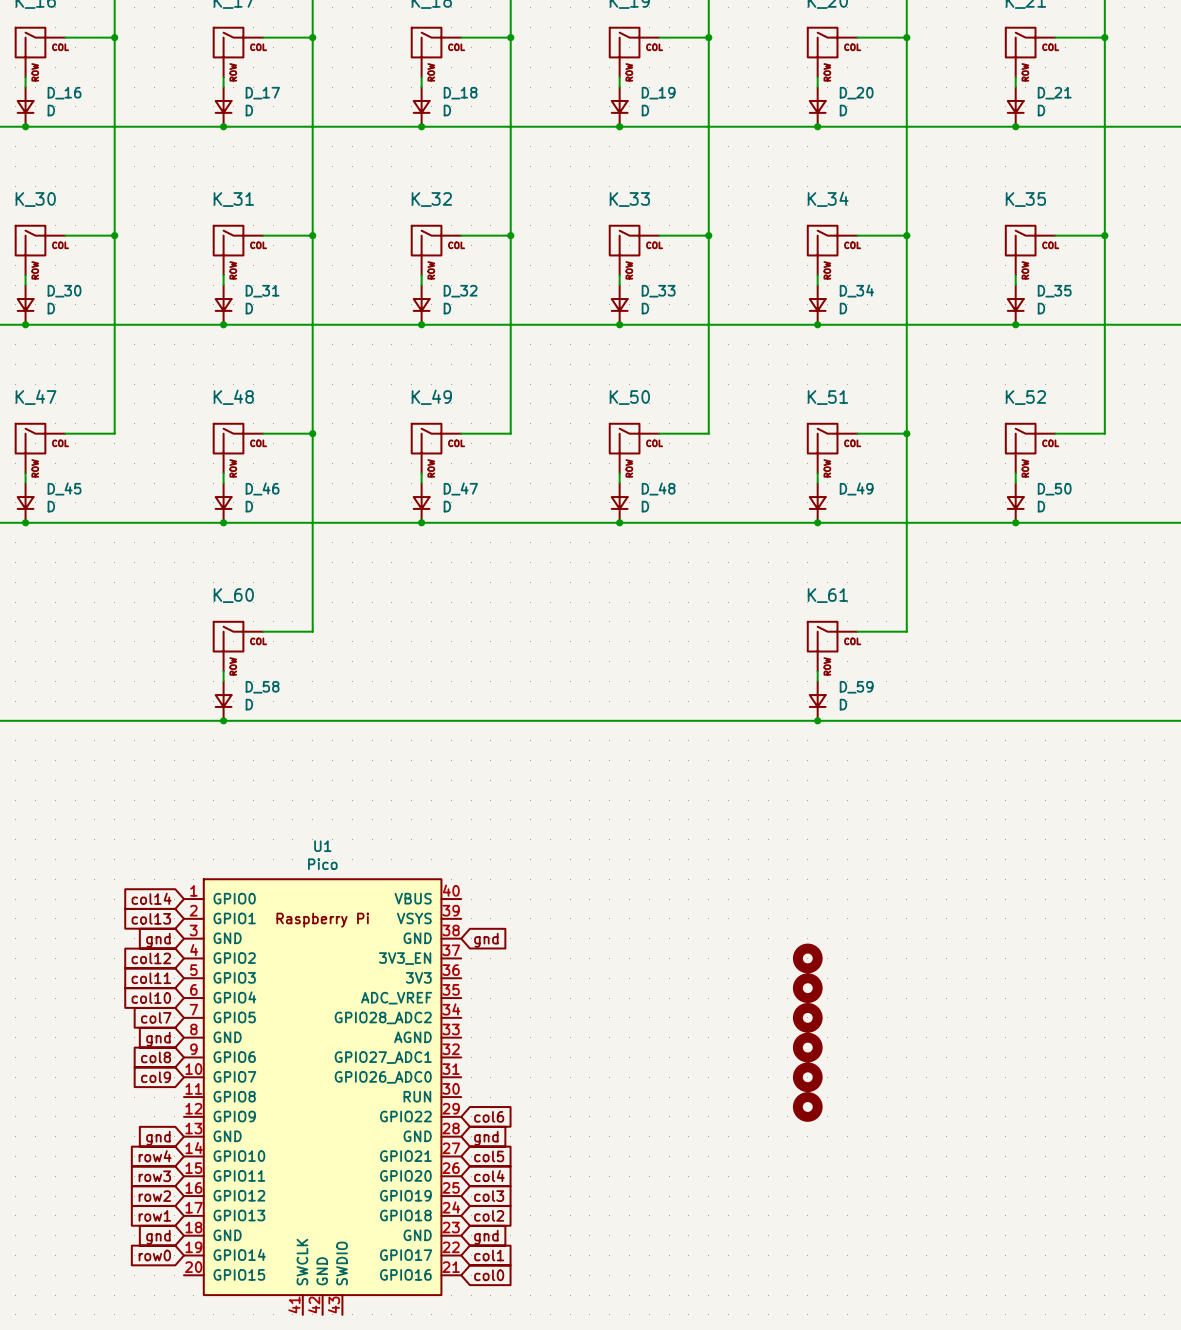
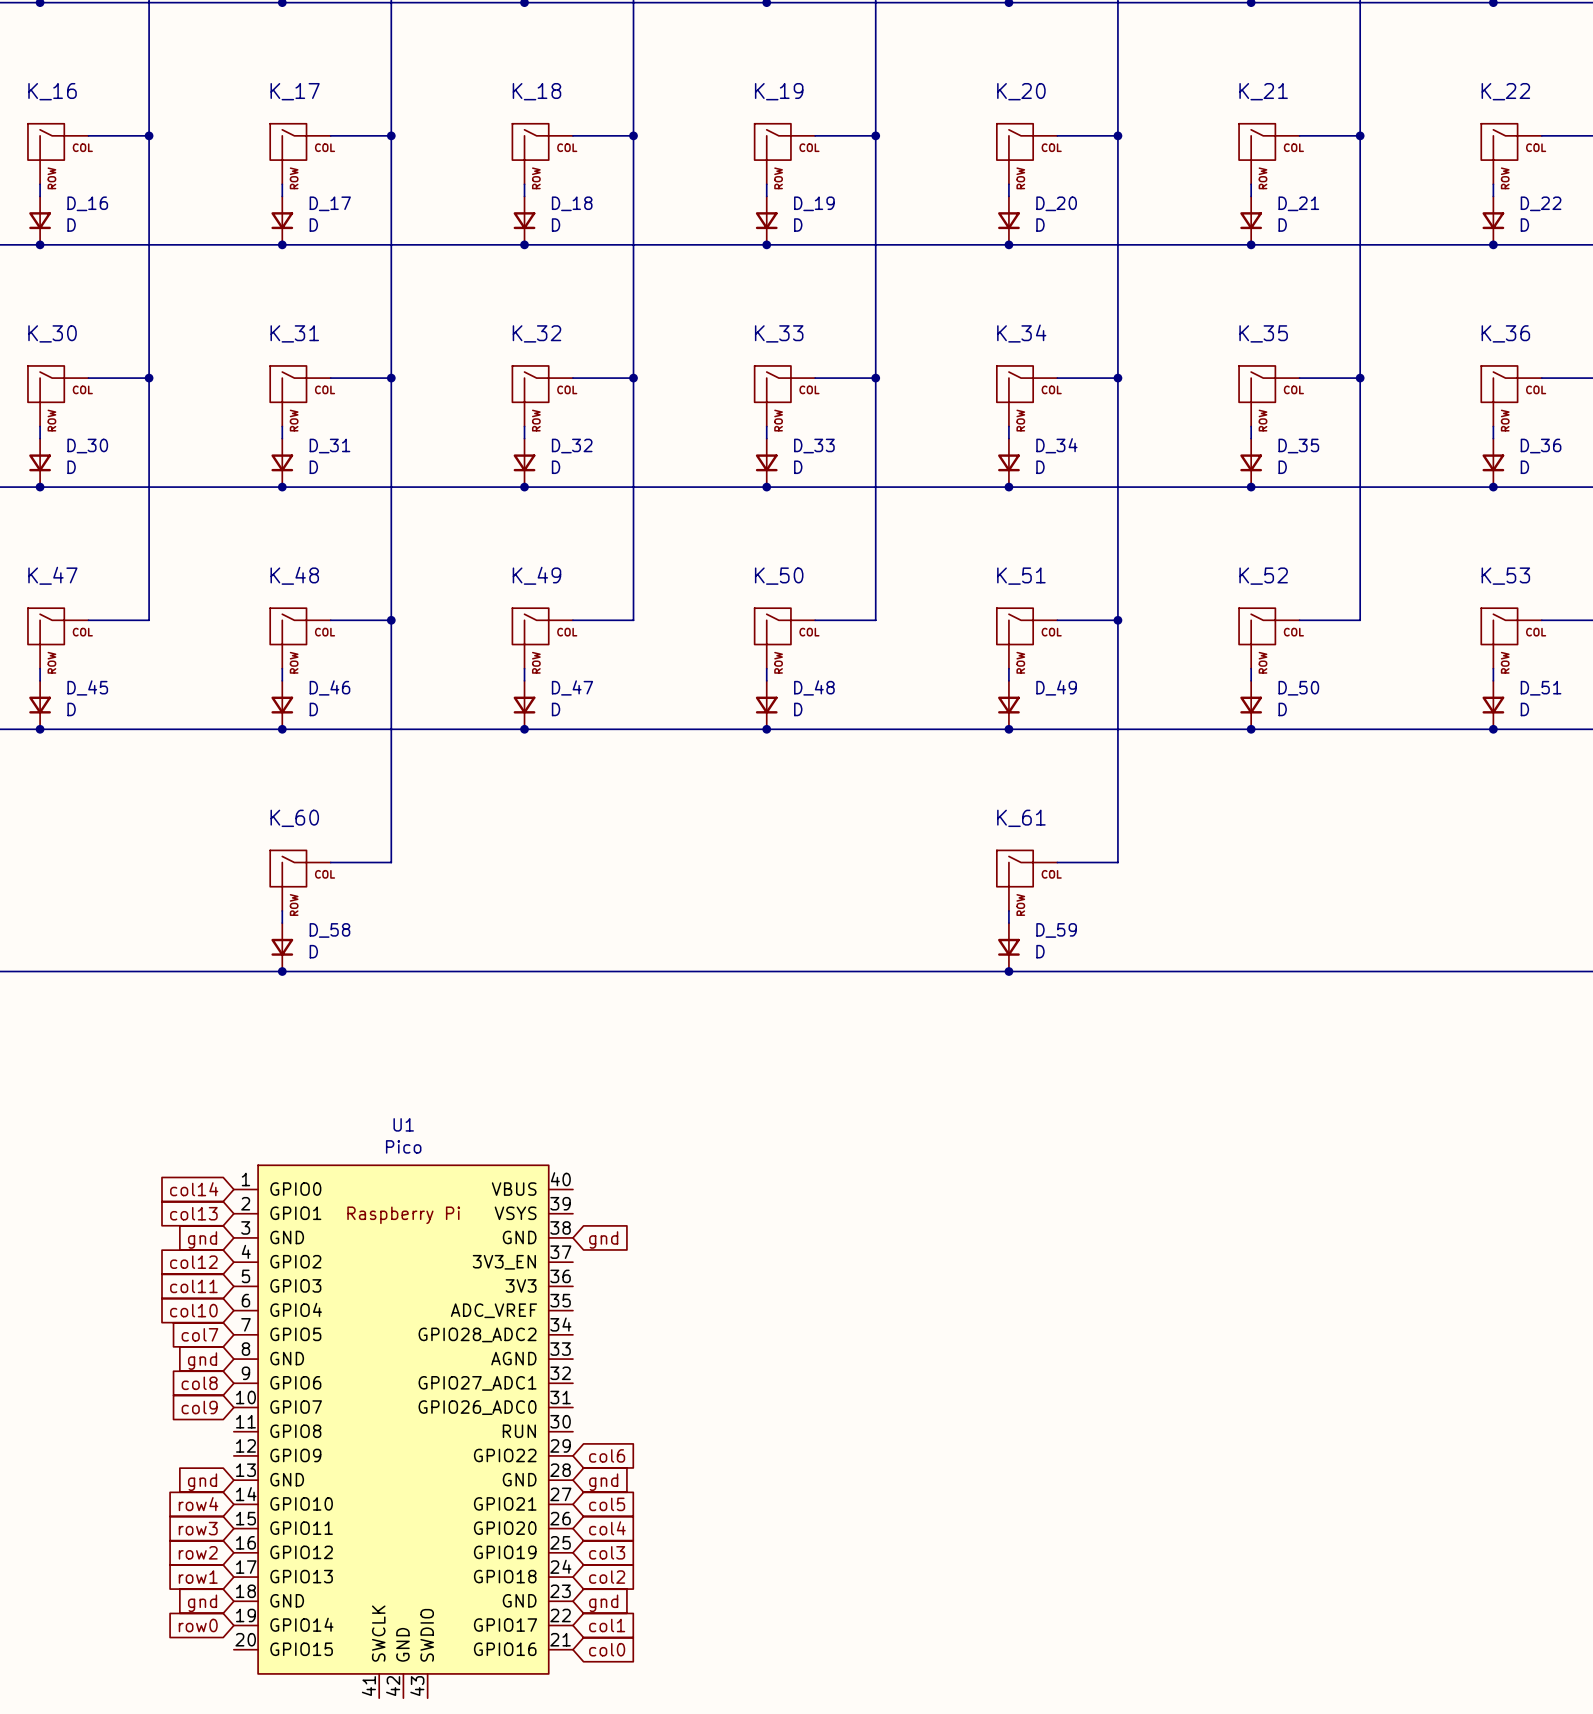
part: (807, 958) -> none
part: (807, 988) -> none
part: (807, 1017) -> none
part: (807, 1047) -> none
part: (807, 1077) -> none
part: (807, 1106) -> none

